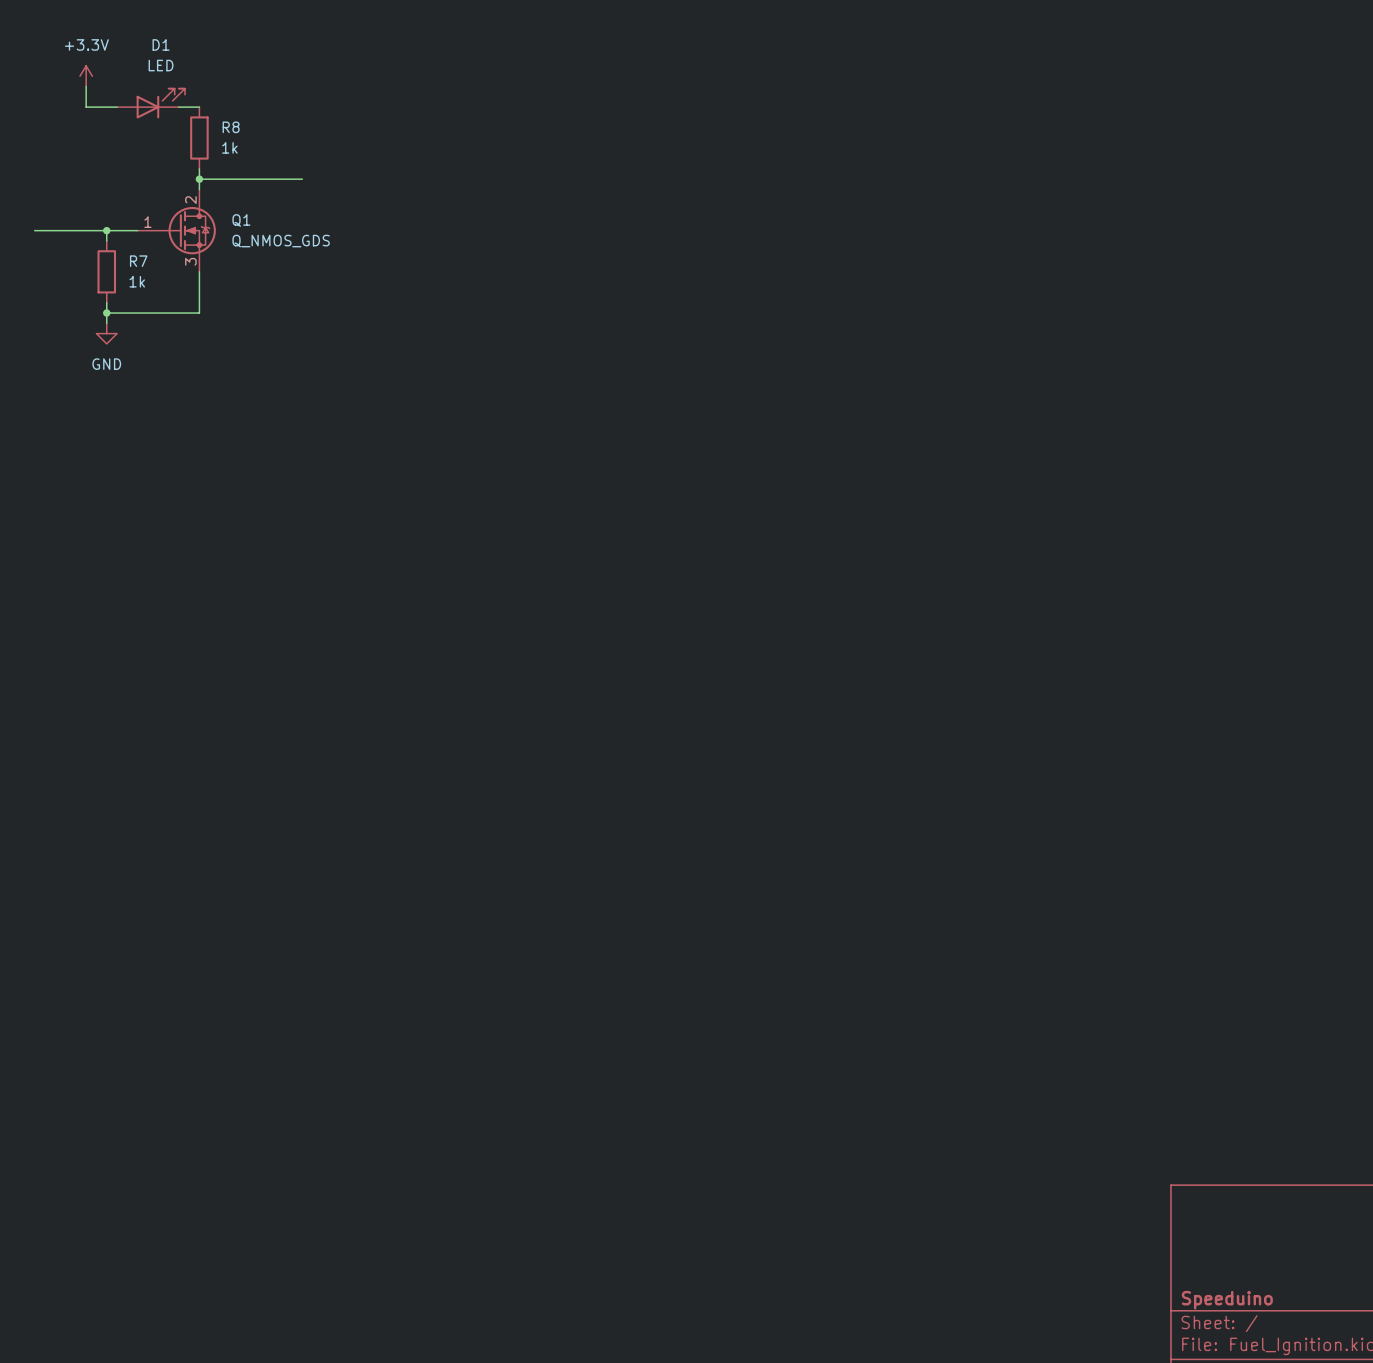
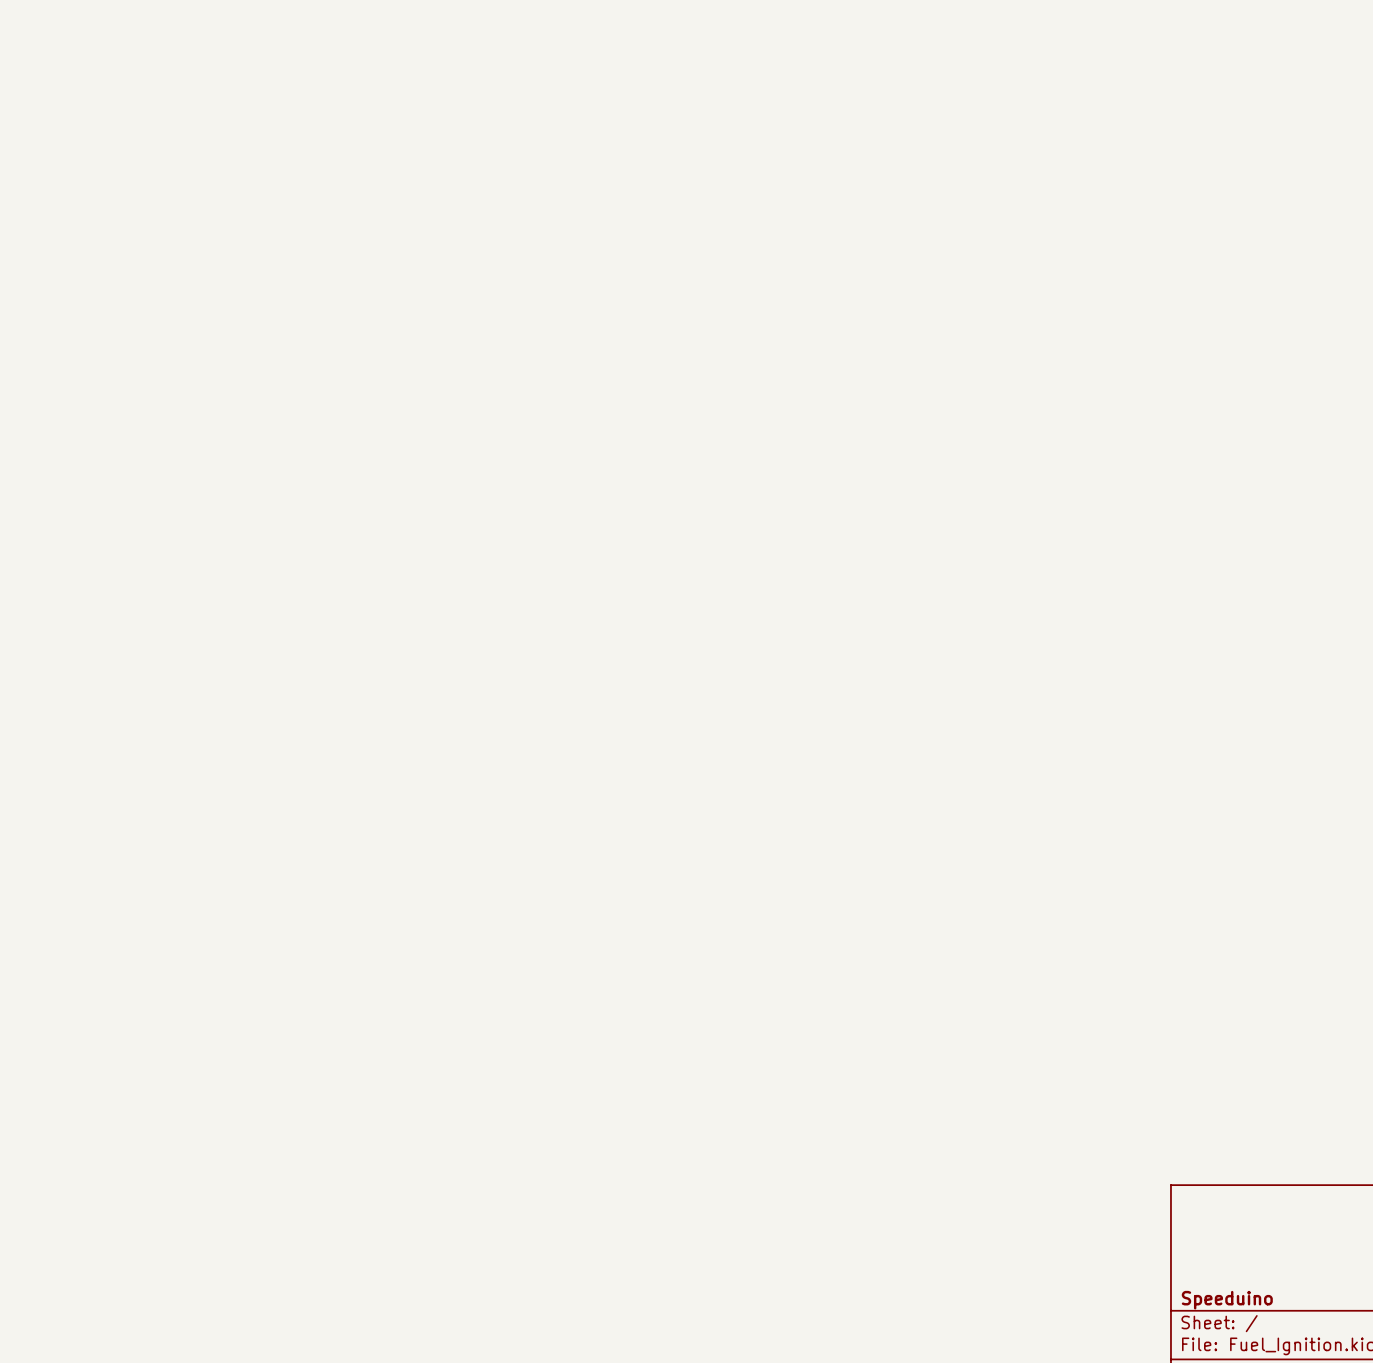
power symbol: +3.3V (86, 76) -> none
wire: (86, 86) (86, 107) (117, 107) -> none
D1: LED (151, 103) -> none
wire: (178, 107) (199, 107) -> none
R8: 1k (199, 138) -> none
wire: (199, 168) (199, 189) -> none
wire: (199, 179) (302, 179) -> none
junction: (199, 179) -> none
wire: (34, 230) (137, 230) -> none
wire: (106, 230) (106, 240) -> none
junction: (106, 230) -> none
Q1: Q_NMOS_GDS (176, 230) -> none
R7: 1k (106, 271) -> none
wire: (199, 271) (199, 313) (106, 313) -> none
wire: (106, 302) (106, 323) -> none
junction: (106, 313) -> none
power symbol: GND (106, 333) -> none

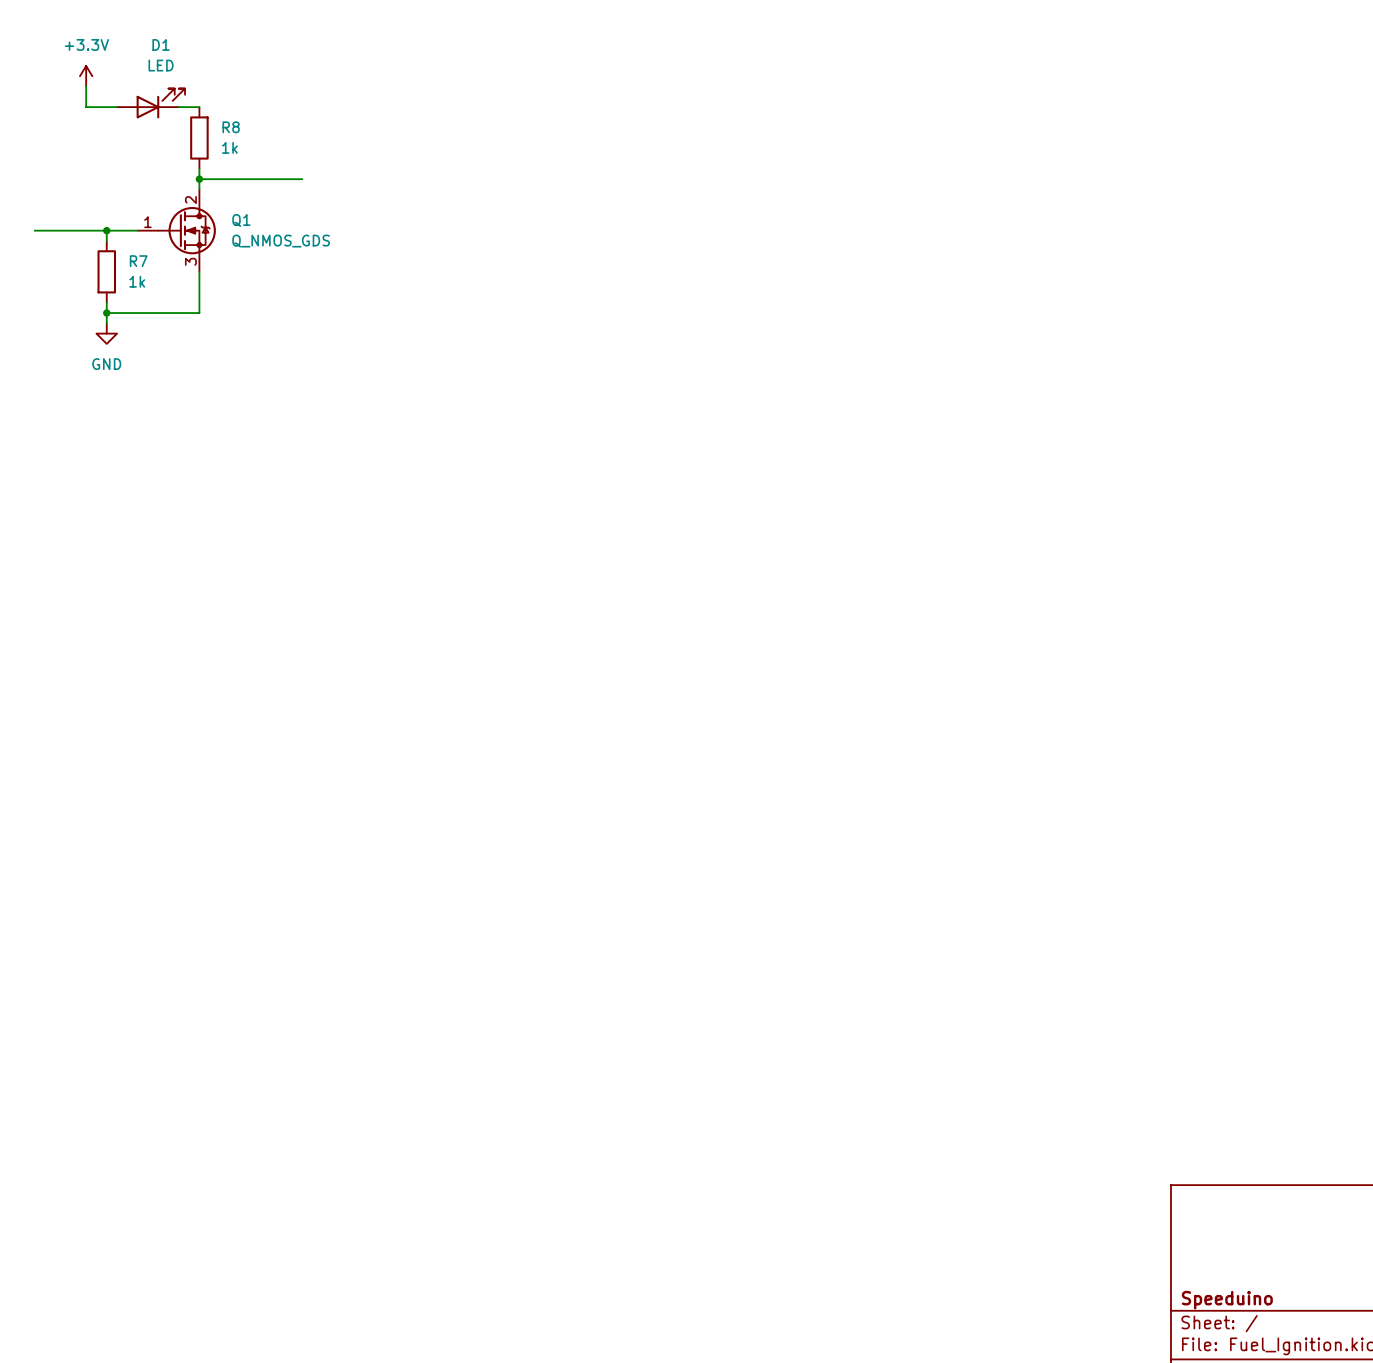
power symbol: none -> +3.3V (86, 76)
wire: none -> (86, 86) (86, 107) (117, 107)
D1: none -> LED (151, 103)
wire: none -> (178, 107) (199, 107)
R8: none -> 1k (199, 138)
wire: none -> (199, 168) (199, 189)
wire: none -> (199, 179) (302, 179)
junction: none -> (199, 179)
wire: none -> (34, 230) (137, 230)
wire: none -> (106, 230) (106, 240)
junction: none -> (106, 230)
Q1: none -> Q_NMOS_GDS (176, 230)
R7: none -> 1k (106, 271)
wire: none -> (199, 271) (199, 313) (106, 313)
wire: none -> (106, 302) (106, 323)
junction: none -> (106, 313)
power symbol: none -> GND (106, 333)

